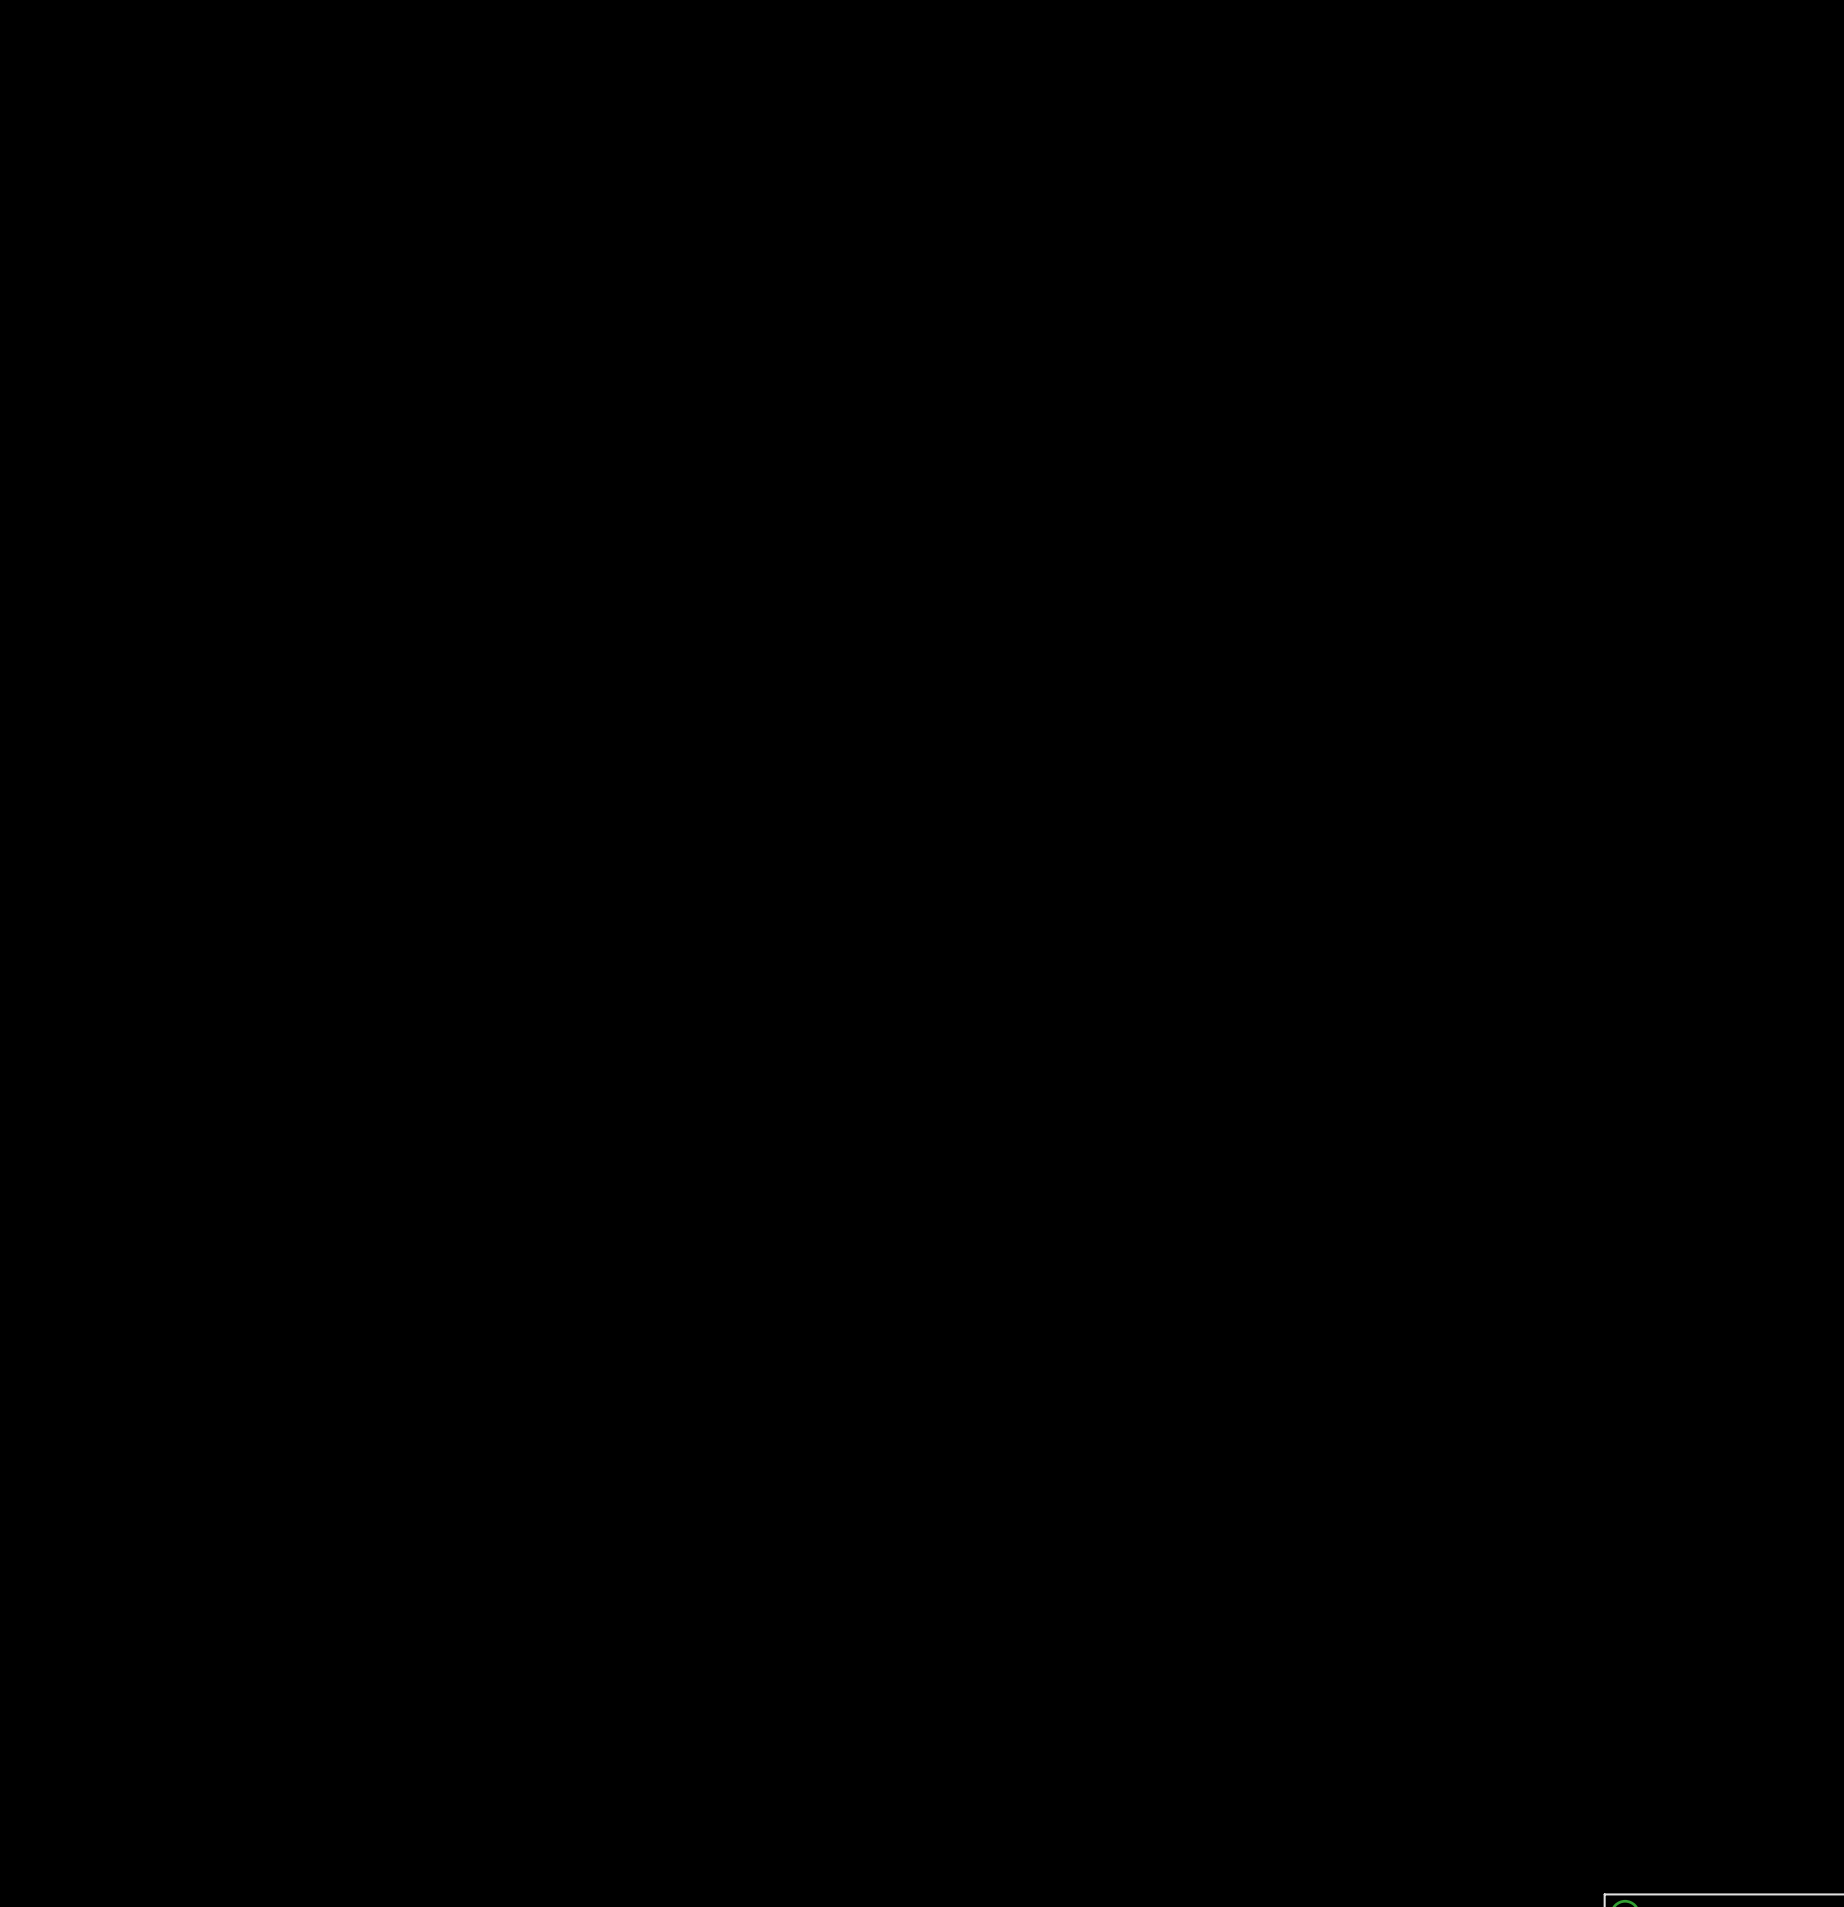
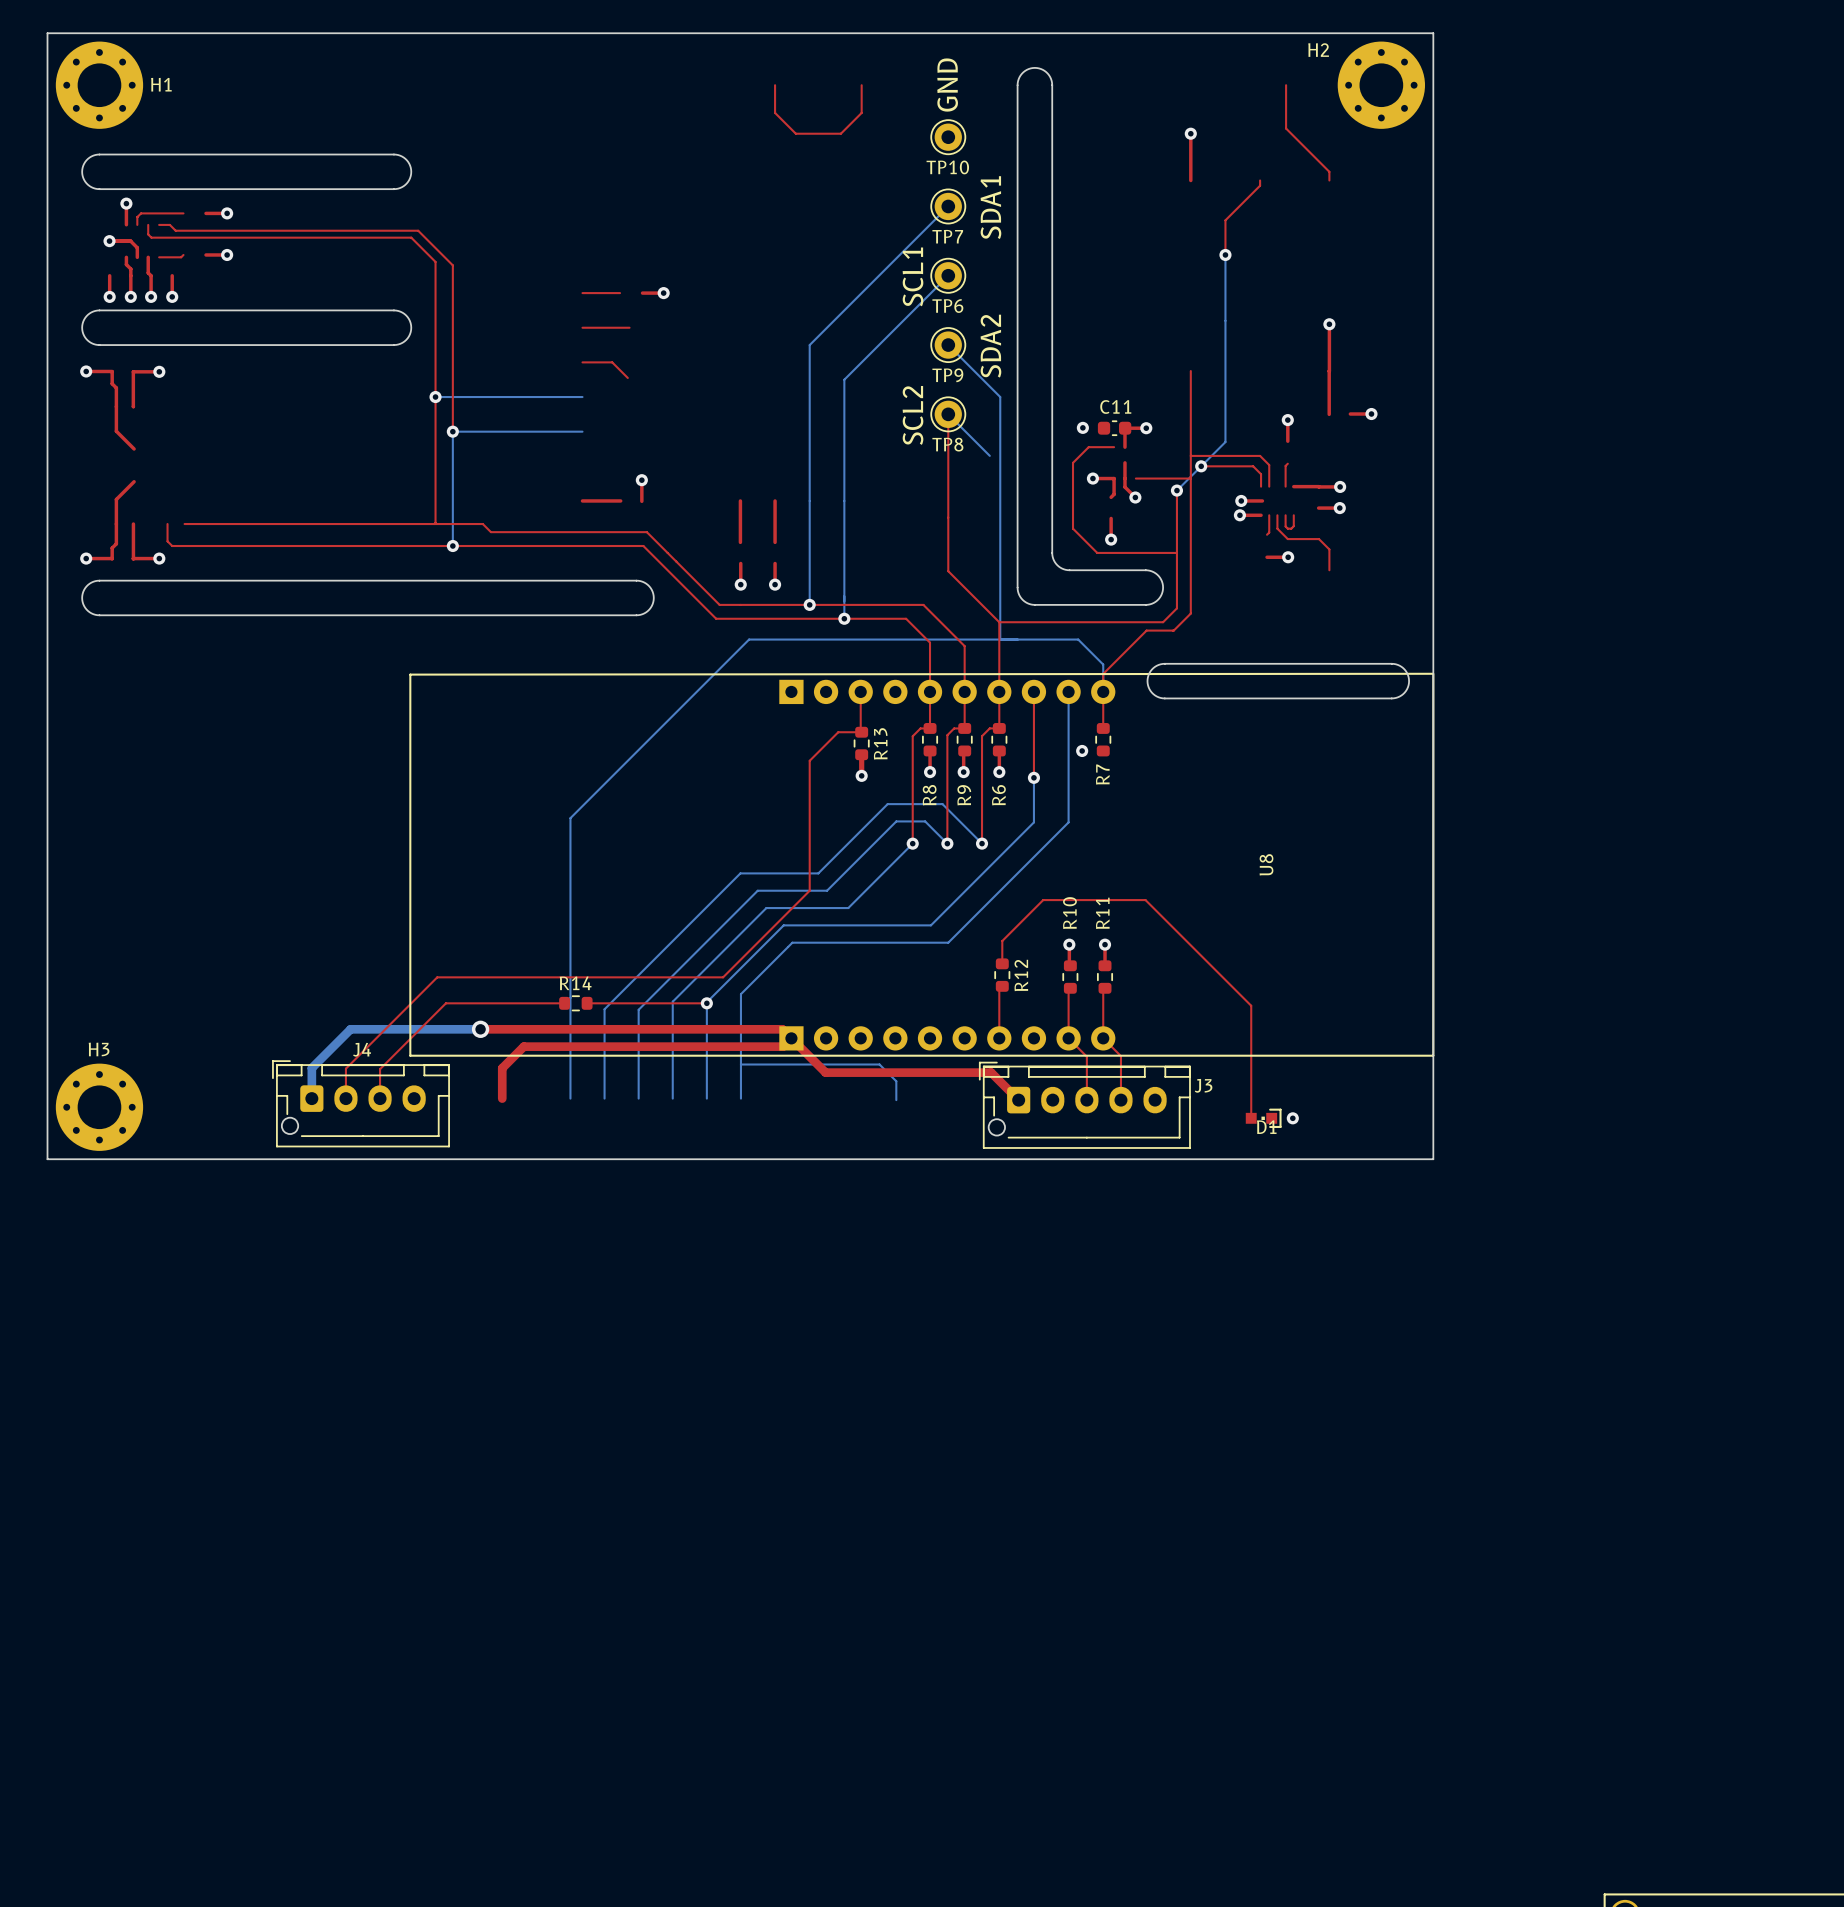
board edge: none -> (47, 33) (47, 1159) (1433, 1159) (1433, 33) (47, 33)
H1: none -> (99, 85)
top track: none -> (775, 85) (775, 112) (795, 133) (840, 133) (861, 112) (861, 85)
text: none -> GND (947, 85)
board edge: none -> (1017, 85) (1018, 591) (1024, 601) (1032, 604) (1149, 604) (1158, 599) (1162, 589) (1161, 579) (1153, 572) (1145, 570) (1067, 570) (1057, 565) (1052, 556) (1052, 83) (1046, 72) (1032, 68) (1021, 73) (1017, 85)
top track: none -> (1286, 85) (1286, 128) (1329, 171) (1329, 180)
H2: none -> (1381, 85)
top track: none -> (1190, 133) (1190, 180)
via: none -> (1190, 133)
TP10: none -> (948, 137)
board edge: none -> (99, 154) (393, 154) (406, 160) (411, 171) (405, 184) (393, 189) (99, 189) (87, 184) (82, 171) (87, 158) (99, 154)
top track: none -> (1260, 180) (1260, 185) (1225, 220) (1225, 254)
top track: none -> (126, 203) (126, 224)
via: none -> (126, 203)
bottom track: none -> (948, 206) (809, 345) (809, 604)
TP7: none -> (948, 206)
text: none -> SDA1 (990, 207)
top track: none -> (183, 213) (141, 213) (137, 217) (137, 224)
top track: none -> (206, 213) (227, 213)
via: none -> (227, 213)
top track: none -> (148, 224) (148, 234) (151, 237) (411, 237) (435, 261) (434, 524)
top track: none -> (159, 224) (169, 224) (175, 230) (418, 230) (452, 265) (452, 431)
top track: none -> (109, 241) (130, 241) (137, 247) (137, 257)
via: none -> (109, 241)
top track: none -> (183, 254) (181, 257) (159, 257)
top track: none -> (206, 254) (227, 254)
via: none -> (227, 254)
bottom track: none -> (1225, 254) (1225, 442) (1176, 490)
via: none -> (1225, 254)
top track: none -> (126, 257) (126, 264) (130, 269) (130, 296)
top track: none -> (148, 257) (148, 272) (151, 275) (151, 296)
top track: none -> (109, 275) (109, 296)
top track: none -> (172, 275) (172, 296)
text: none -> SCL1 (912, 276)
bottom track: none -> (948, 275) (844, 379) (844, 618)
TP6: none -> (948, 275)
top track: none -> (582, 293) (620, 293)
top track: none -> (642, 293) (663, 293)
via: none -> (663, 293)
via: none -> (109, 296)
via: none -> (130, 296)
via: none -> (151, 296)
via: none -> (172, 296)
board edge: none -> (99, 310) (393, 310) (406, 315) (411, 327) (406, 339) (393, 345) (99, 345) (87, 340) (82, 327) (86, 316) (99, 310)
top track: none -> (1329, 324) (1329, 371)
via: none -> (1329, 324)
top track: none -> (582, 327) (629, 327)
bottom track: none -> (948, 345) (1000, 397) (1000, 639)
TP9: none -> (948, 345)
text: none -> SDA2 (990, 346)
top track: none -> (582, 362) (612, 362) (627, 377)
top track: none -> (86, 371) (112, 371)
via: none -> (86, 371)
top track: none -> (112, 371) (112, 383) (116, 387) (116, 431) (134, 449)
top track: none -> (159, 371) (133, 371) (133, 406)
via: none -> (159, 371)
top track: none -> (1190, 371) (1190, 613) (1173, 630) (1146, 630) (1103, 673) (1103, 728)
top track: none -> (1329, 371) (1329, 414)
bottom track: none -> (435, 397) (582, 397)
via: none -> (435, 397)
text: none -> SCL2 (912, 415)
top track: none -> (948, 414) (948, 571) (999, 622)
bottom track: none -> (948, 414) (989, 455)
TP8: none -> (948, 414)
top track: none -> (1350, 414) (1371, 414)
via: none -> (1371, 414)
top track: none -> (1287, 420) (1287, 441)
via: none -> (1287, 420)
via: none -> (1082, 427)
C11: none -> (1114, 428)
top track: none -> (1124, 428) (1124, 447)
top track: none -> (1125, 428) (1146, 428)
via: none -> (1146, 428)
via: none -> (452, 431)
bottom track: none -> (582, 431) (452, 431) (452, 546)
top track: none -> (1114, 447) (1088, 447) (1073, 462) (1073, 528) (1097, 552) (1176, 552)
top track: none -> (1190, 455) (1260, 455) (1269, 465) (1269, 486)
top track: none -> (1124, 462) (1124, 487) (1135, 497)
top track: none -> (1287, 463) (1285, 465) (1285, 486)
top track: none -> (1201, 466) (1253, 466) (1261, 474) (1261, 486)
via: none -> (1201, 466)
top track: none -> (1092, 478) (1114, 478) (1114, 494) (1111, 497)
via: none -> (1092, 478)
top track: none -> (1135, 478) (1190, 478)
top track: none -> (641, 480) (641, 501)
via: none -> (641, 480)
top track: none -> (134, 481) (116, 499) (116, 543) (112, 548) (112, 558)
top track: none -> (1293, 486) (1340, 486)
via: none -> (1340, 486)
top track: none -> (1176, 490) (1176, 608) (1163, 622) (999, 622)
via: none -> (1176, 490)
via: none -> (1135, 497)
top track: none -> (582, 500) (620, 500)
top track: none -> (740, 500) (740, 542)
top track: none -> (775, 500) (775, 542)
top track: none -> (1241, 500) (1262, 500)
via: none -> (1241, 500)
top track: none -> (1318, 508) (1339, 508)
via: none -> (1339, 508)
top track: none -> (1239, 515) (1261, 515)
via: none -> (1239, 515)
top track: none -> (1269, 515) (1269, 532) (1267, 534)
top track: none -> (1277, 515) (1277, 528) (1287, 539) (1319, 539) (1329, 549) (1329, 570)
top track: none -> (1285, 515) (1285, 526) (1287, 528) (1293, 526) (1293, 515)
top track: none -> (1111, 518) (1111, 539)
top track: none -> (133, 524) (133, 558)
top track: none -> (167, 524) (167, 541) (172, 546) (643, 546) (716, 618) (906, 618) (930, 642) (930, 728) (920, 728) (912, 736) (912, 843)
top track: none -> (184, 524) (482, 524) (490, 532) (646, 532) (719, 604) (923, 604) (964, 646) (964, 728)
via: none -> (1111, 539)
via: none -> (452, 546)
top track: none -> (1267, 557) (1288, 557)
via: none -> (1288, 557)
top track: none -> (86, 558) (112, 558)
via: none -> (86, 558)
top track: none -> (133, 558) (159, 558)
via: none -> (159, 558)
top track: none -> (740, 563) (740, 584)
top track: none -> (775, 563) (775, 584)
board edge: none -> (99, 580) (636, 580) (649, 586) (653, 597) (649, 609) (636, 615) (99, 615) (86, 609) (82, 597) (87, 585) (99, 580)
via: none -> (740, 584)
via: none -> (775, 584)
via: none -> (809, 604)
via: none -> (844, 618)
top track: none -> (999, 622) (999, 728) (989, 728) (982, 736) (982, 843)
board edge: none -> (1164, 663) (1393, 663) (1404, 669) (1408, 683) (1404, 692) (1393, 698) (1162, 698) (1151, 692) (1147, 681) (1151, 669) (1164, 663)
top track: none -> (860, 691) (861, 732) (838, 732) (809, 760) (809, 890) (723, 977) (437, 977) (345, 1068) (345, 1098)
top track: none -> (1033, 691) (1033, 777)
bottom track: none -> (1068, 691) (1068, 822) (948, 942) (792, 942) (740, 994) (740, 1098)
bottom track: none -> (1103, 691) (1103, 664) (1078, 639) (749, 639) (570, 818) (570, 1098)
top track: none -> (963, 728) (954, 728) (947, 735) (947, 843)
R8: none -> (930, 739)
R9: none -> (964, 739)
R6: none -> (999, 739)
R7: none -> (1103, 739)
R13: none -> (861, 743)
top track: none -> (930, 750) (930, 772)
top track: none -> (963, 750) (963, 772)
top track: none -> (999, 750) (999, 772)
via: none -> (1082, 750)
top track: none -> (861, 754) (861, 775)
via: none -> (930, 772)
via: none -> (963, 772)
via: none -> (999, 772)
via: none -> (861, 775)
bottom track: none -> (1033, 777) (1033, 822) (930, 925) (783, 925) (706, 1002) (706, 1098)
via: none -> (1033, 777)
bottom track: none -> (912, 843) (848, 908) (766, 908) (672, 1001) (672, 1098)
via: none -> (912, 843)
bottom track: none -> (947, 843) (925, 821) (896, 821) (827, 890) (757, 890) (638, 1009) (638, 1098)
via: none -> (947, 843)
bottom track: none -> (982, 843) (942, 804) (887, 804) (818, 873) (740, 873) (604, 1009) (604, 1098)
via: none -> (982, 843)
U8: none -> (921, 864)
top track: none -> (1069, 944) (1069, 965)
via: none -> (1069, 944)
top track: none -> (1105, 944) (1105, 965)
via: none -> (1105, 944)
top track: none -> (1002, 963) (1002, 940) (1043, 900) (1145, 900) (1251, 1005) (1251, 1118)
R12: none -> (1002, 975)
R10: none -> (1070, 977)
R11: none -> (1105, 977)
top track: none -> (1002, 986) (999, 989) (999, 1038)
top track: none -> (1070, 988) (1068, 990) (1068, 1038) (1086, 1056) (1086, 1100)
top track: none -> (1105, 988) (1103, 990) (1103, 1038) (1120, 1056) (1120, 1100)
top track: none -> (564, 1003) (445, 1003) (380, 1069) (380, 1098)
R14: none -> (575, 1003)
top track: none -> (587, 1003) (705, 1003)
via: none -> (706, 1003)
top track: none -> (480, 1029) (782, 1029) (825, 1072) (991, 1072) (1018, 1100)
bottom track: none -> (480, 1029) (350, 1029) (311, 1068) (311, 1098)
via: none -> (480, 1029)
top track: none -> (791, 1038) (783, 1046) (523, 1046) (502, 1068) (502, 1098)
bottom track: none -> (740, 1064) (879, 1064) (896, 1081) (896, 1100)
J4: none -> (361, 1103)
J3: none -> (1084, 1105)
H3: none -> (99, 1107)
D1: none -> (1263, 1118)
via: none -> (1292, 1118)

